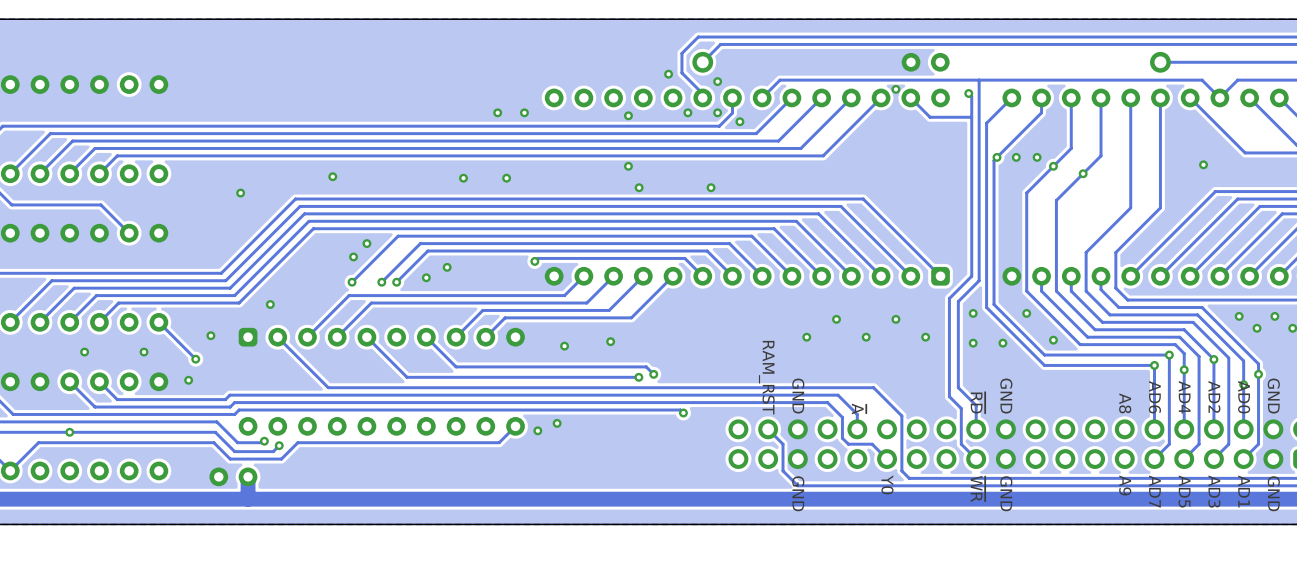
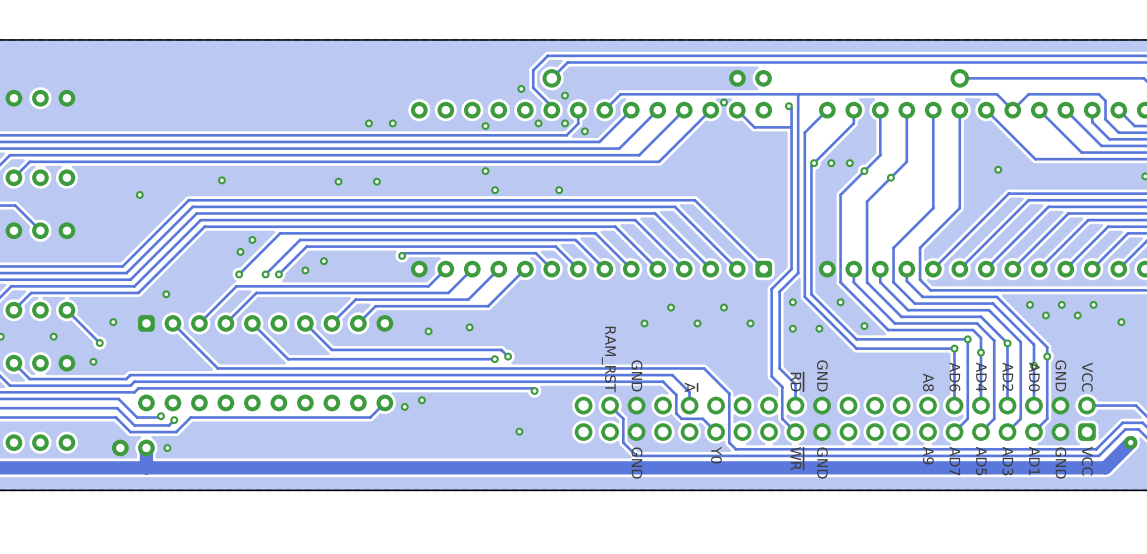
via: none -> (519, 431)
via: none -> (167, 448)

